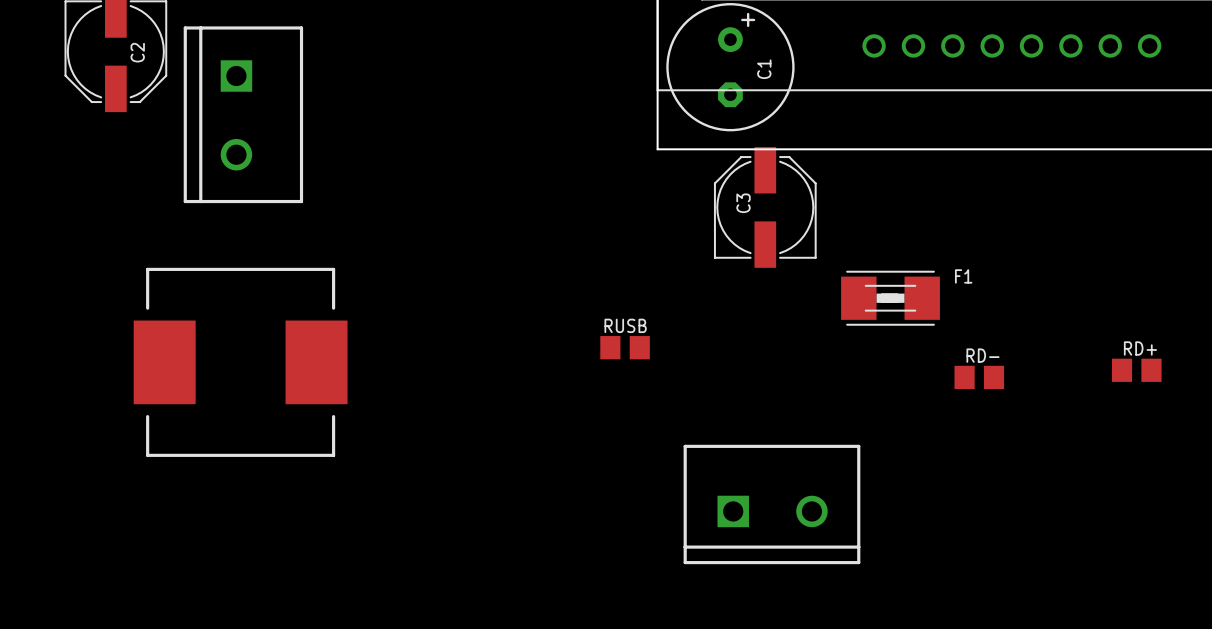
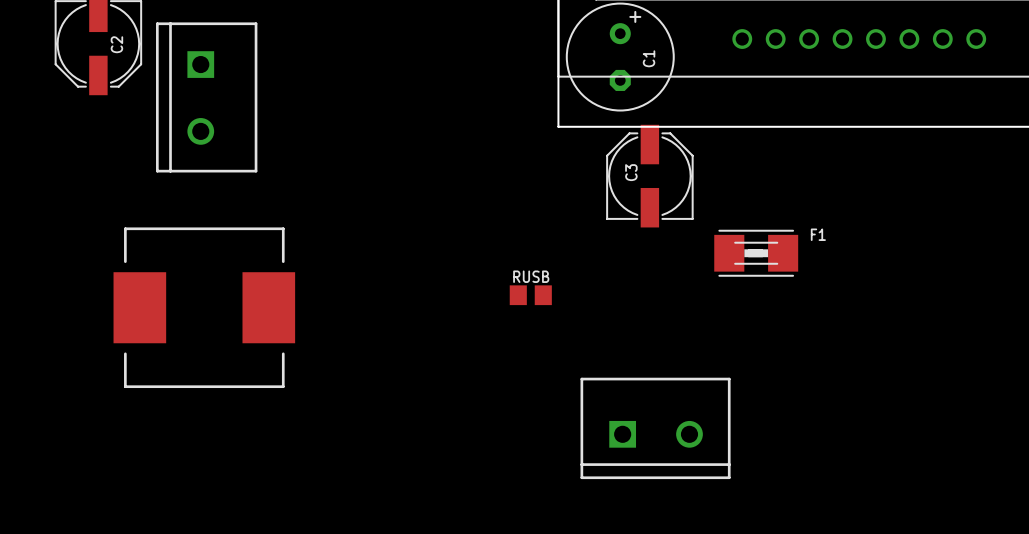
RD+: (1136, 370) -> none
RD-: (979, 377) -> none

